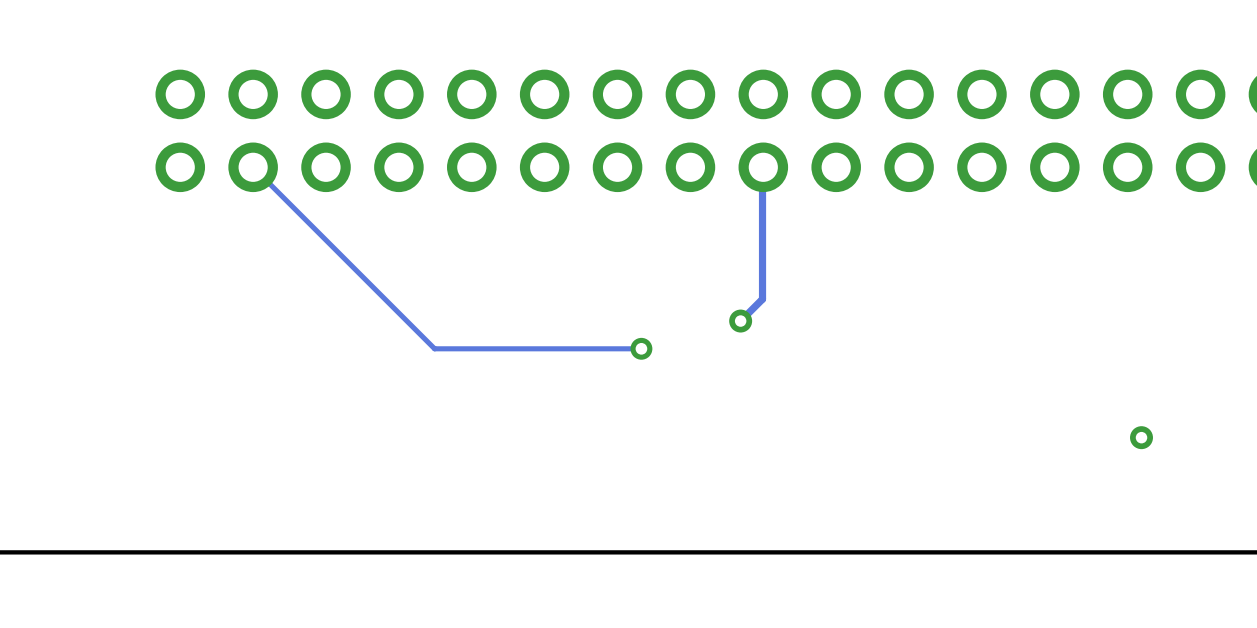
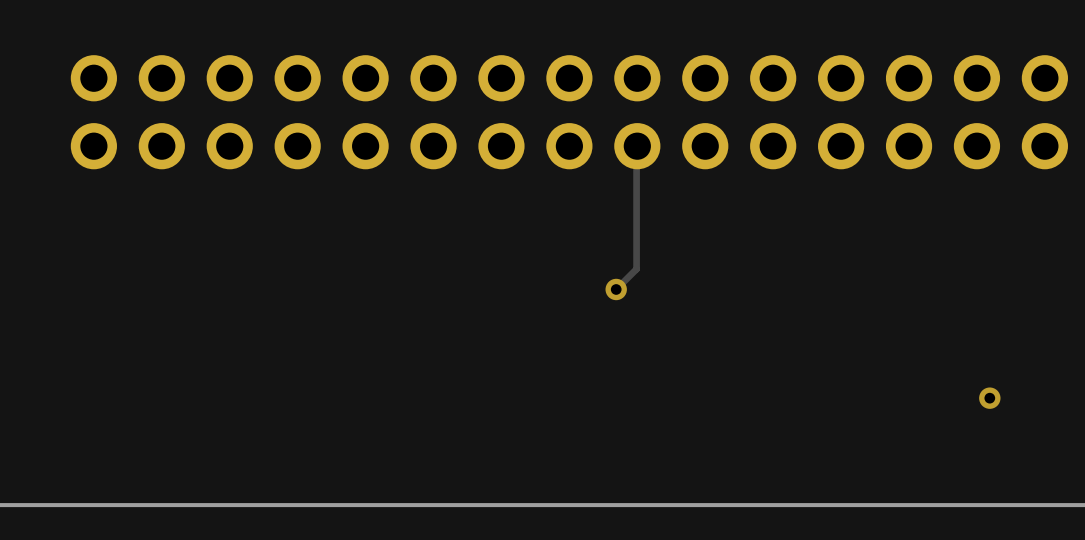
track: (253, 167) (434, 348) (641, 348) -> none
via: (641, 348) -> none

